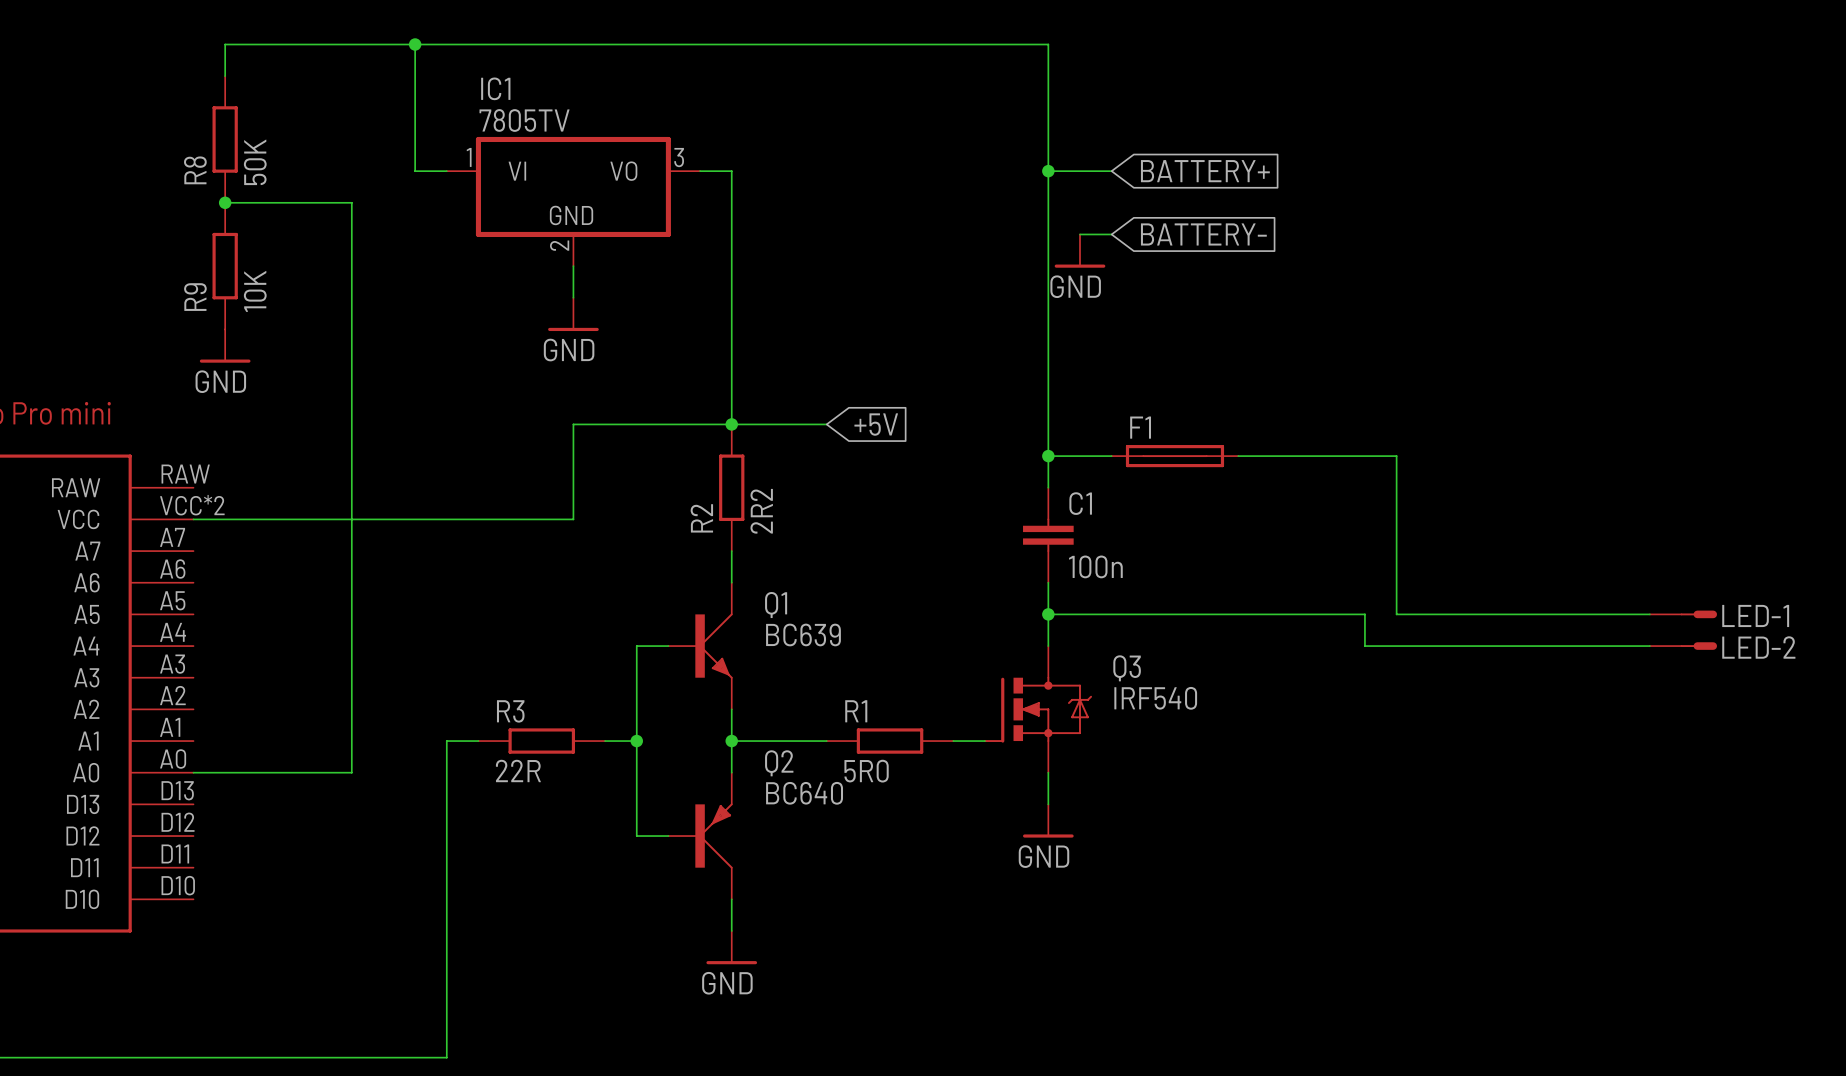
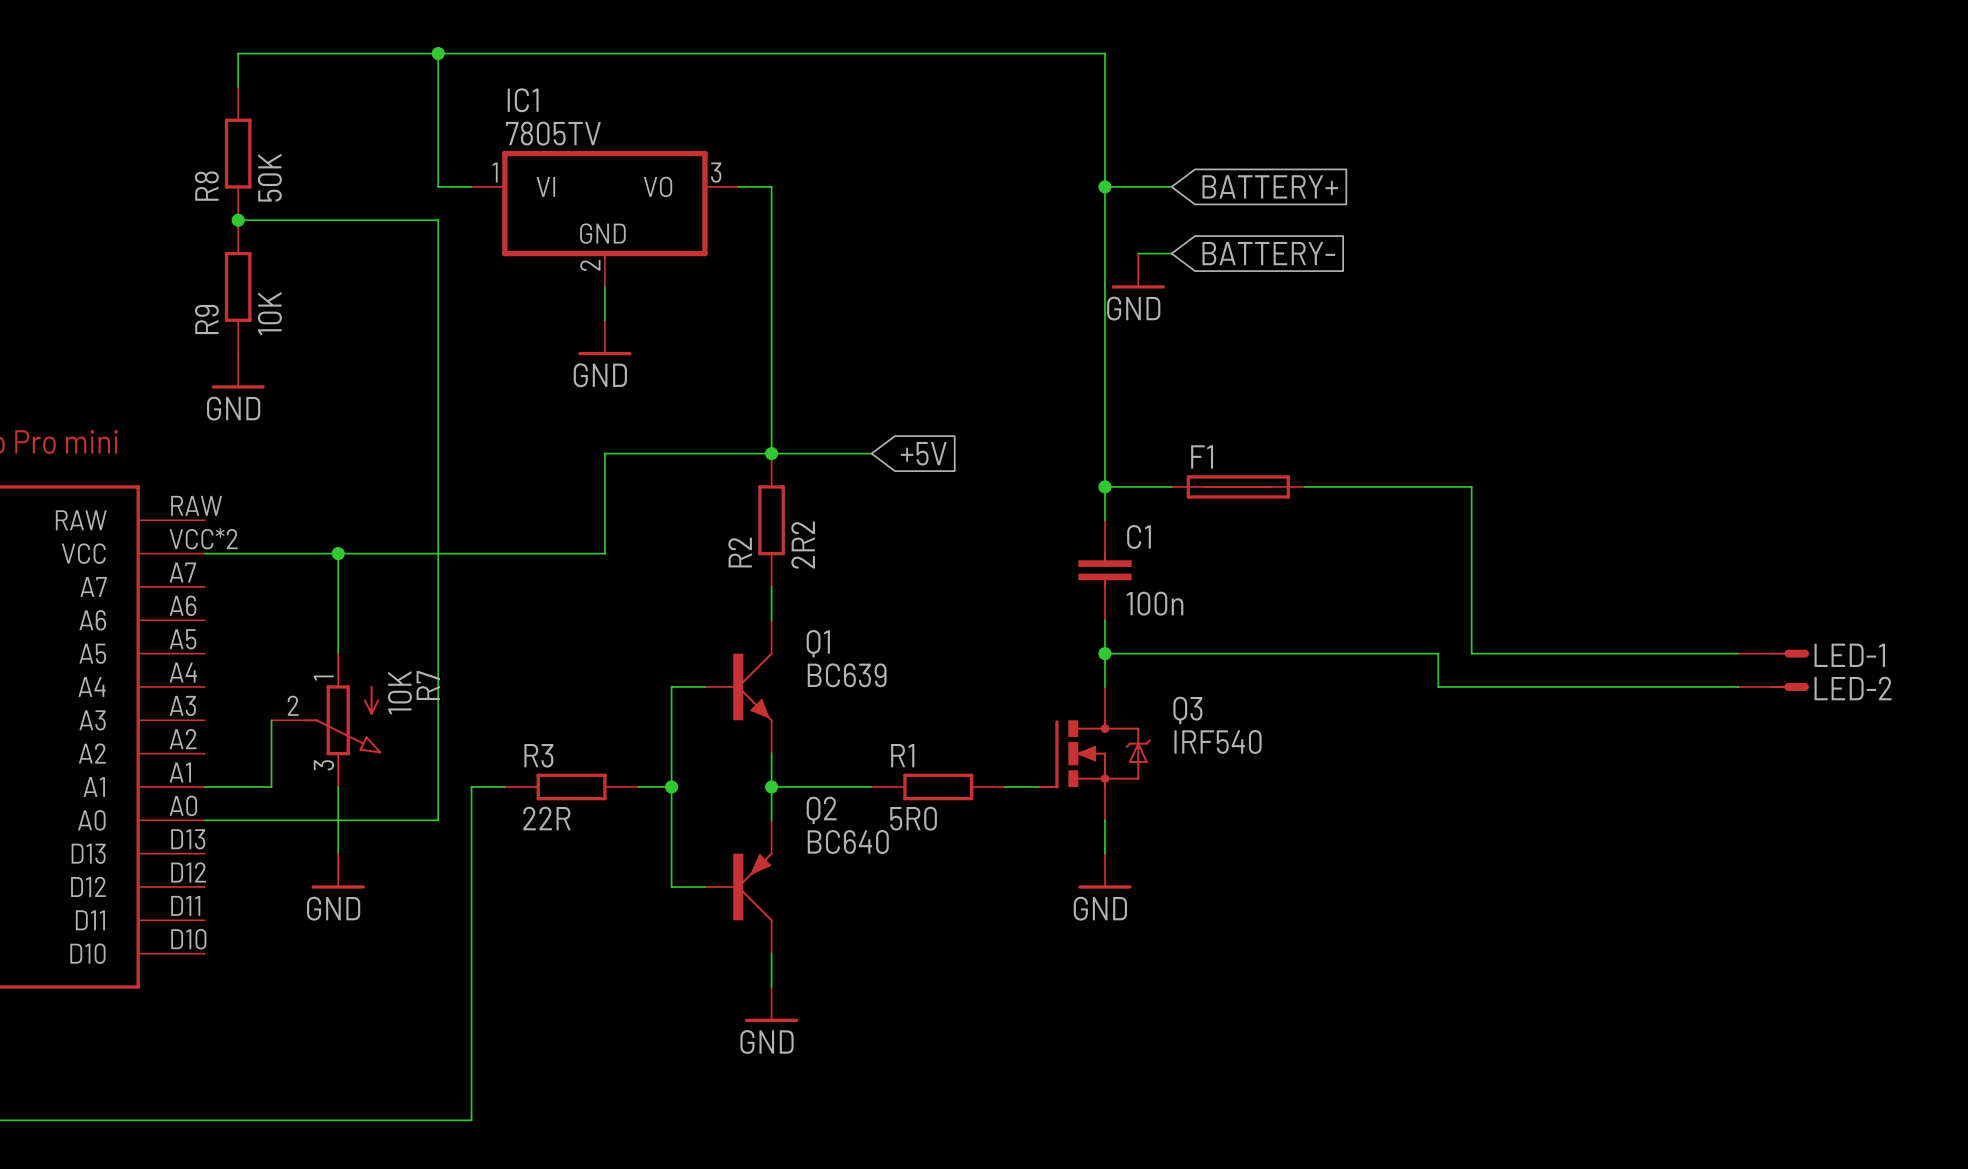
wire: (351, 202) (351, 772) -> (371, 220) (438, 220) (438, 820) (371, 820)
wire: none -> (338, 553) (338, 653)
junction: none -> (338, 553)
wire: none -> (271, 720) (271, 786) (204, 786)
R7: none -> 10K (326, 720)
wire: none -> (338, 786) (338, 853)
power symbol: none -> GND (338, 871)

